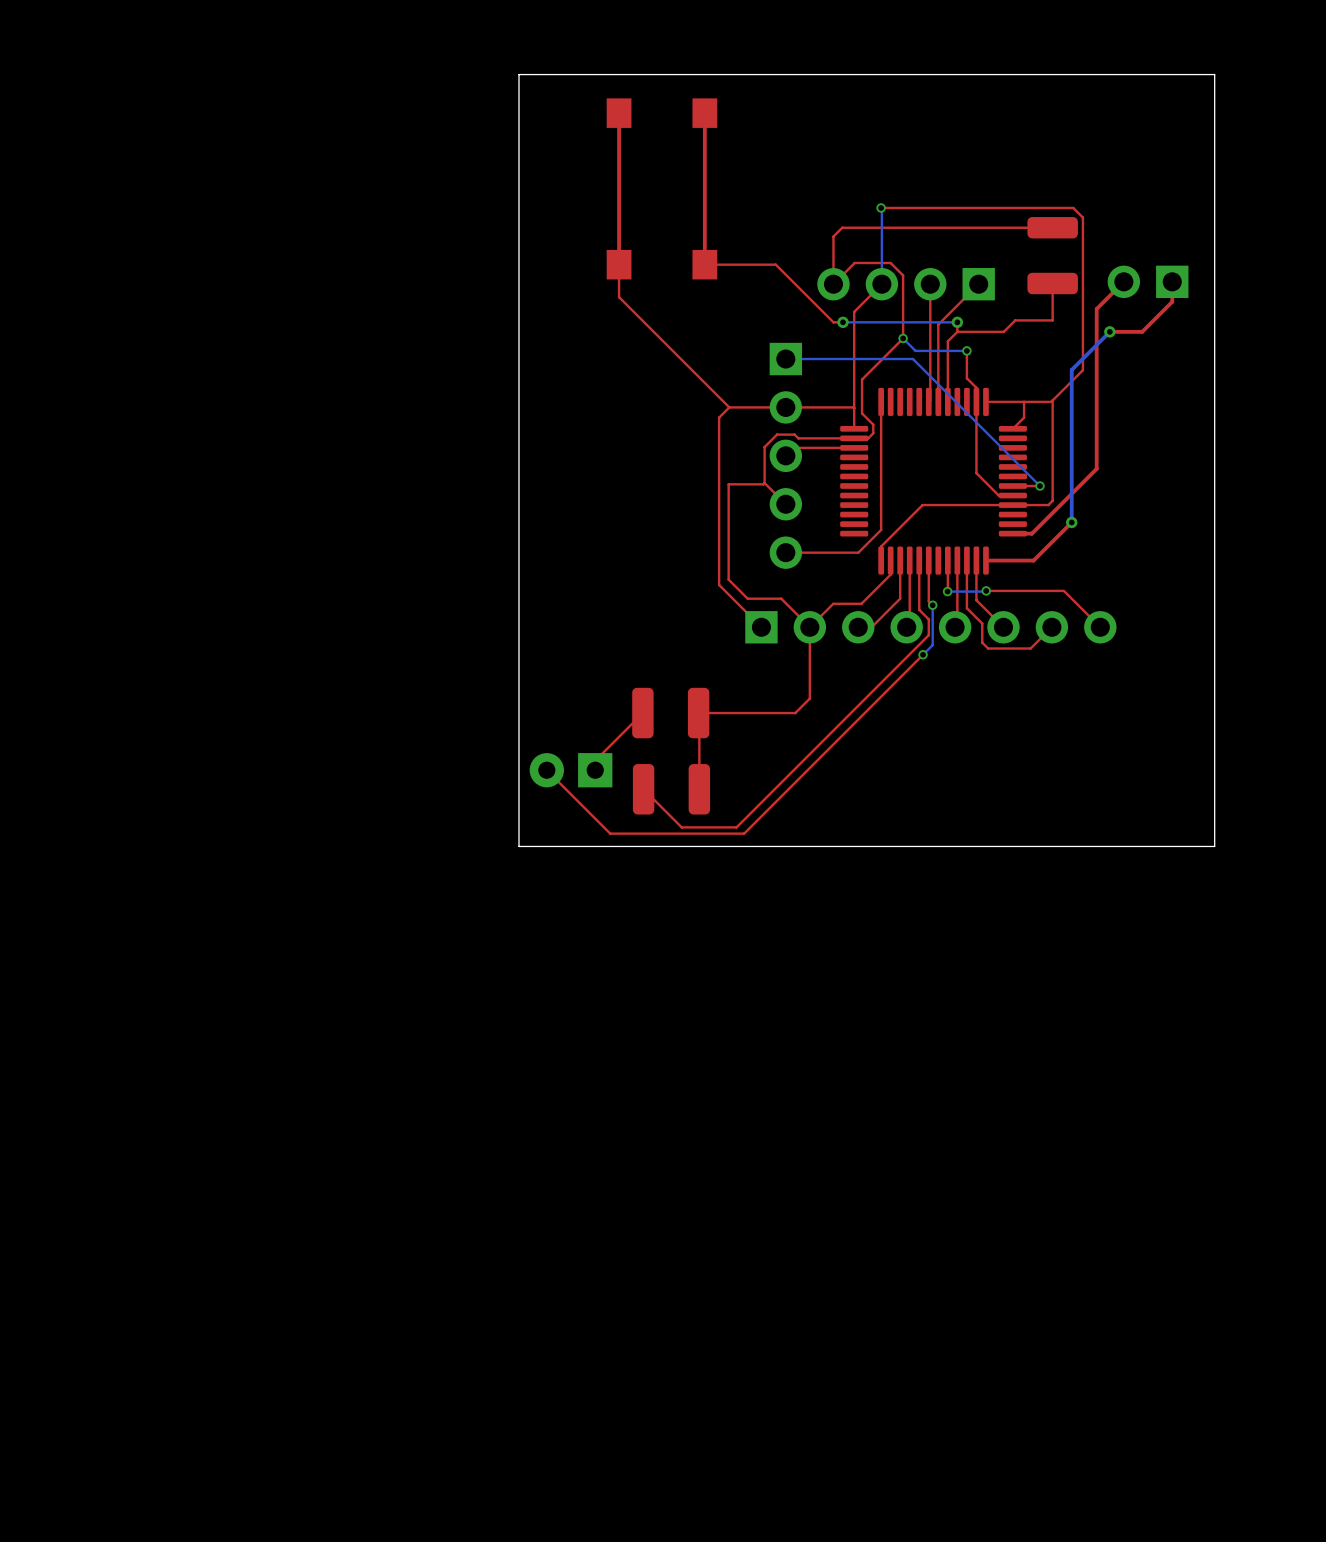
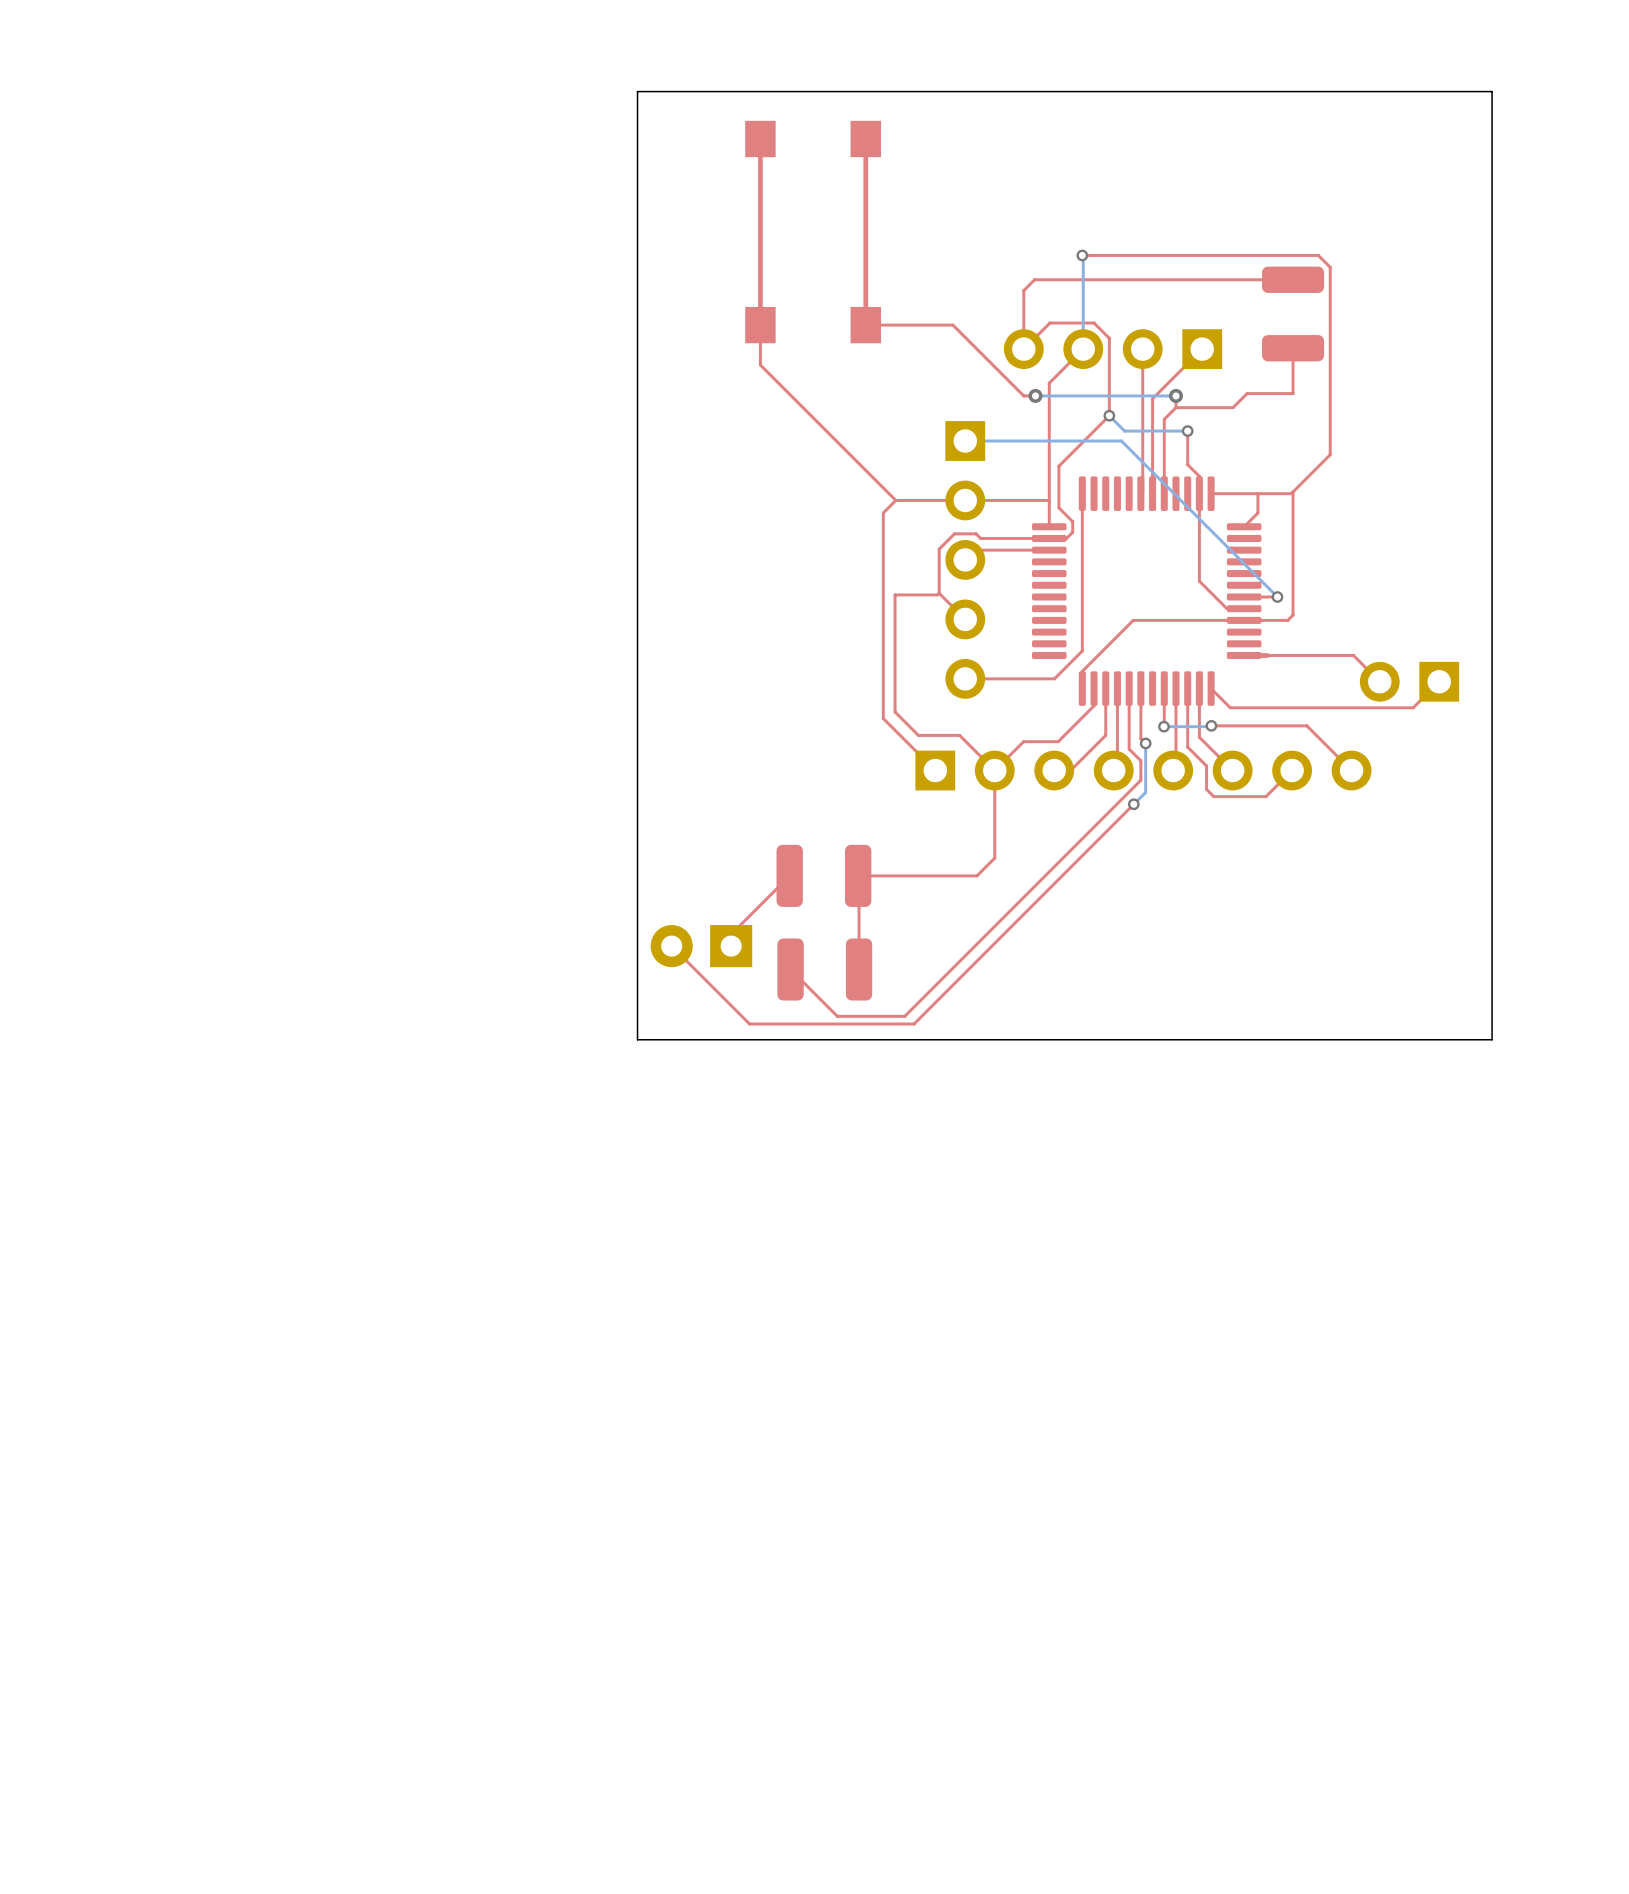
top track: (1123, 281) (1096, 308) (1096, 468) (1031, 533) -> (1379, 681) (1353, 655) (1267, 655)
part position: (1148, 281) -> (1409, 681)
top track: (1172, 281) (1172, 301) (1142, 331) (1109, 331) -> none
bottom track: (1109, 331) (1071, 369) (1071, 522) -> none
via: (1109, 331) -> none
top track: (1071, 522) (1033, 560) (985, 560) -> (1439, 681) (1413, 707) (1230, 707) (1211, 688)
via: (1071, 522) -> none

